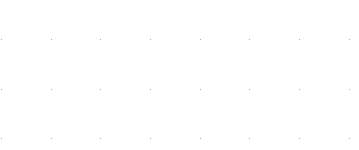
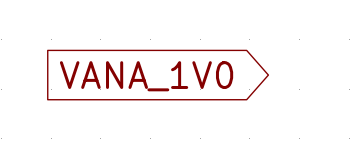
global label: none -> VANA_1V0 (146, 76)

